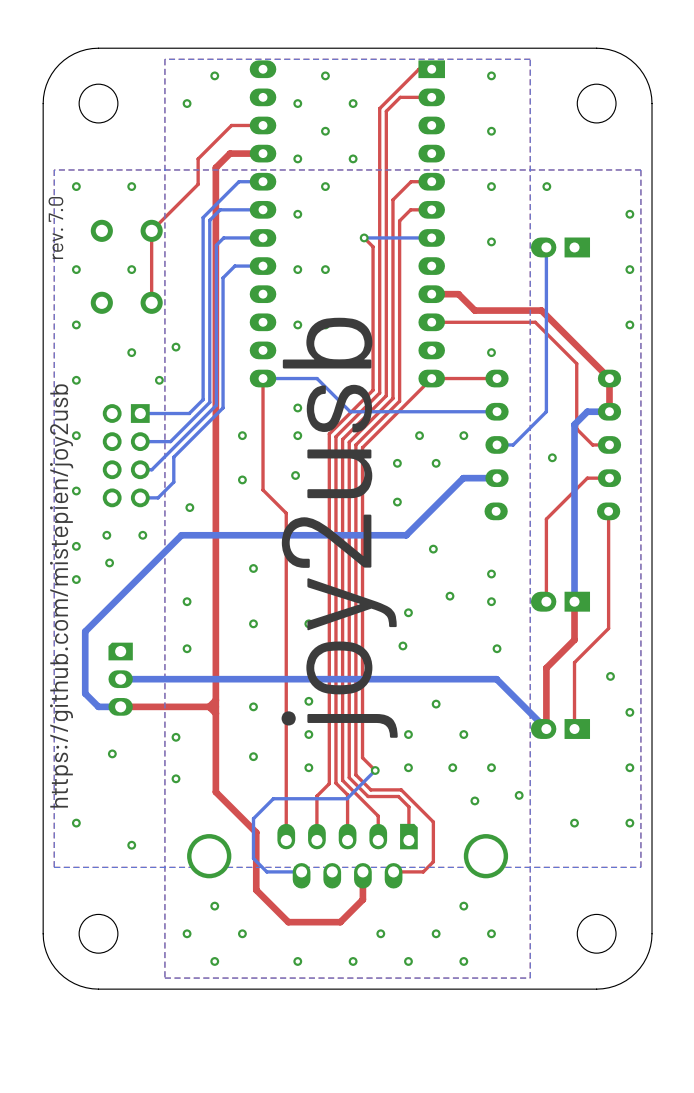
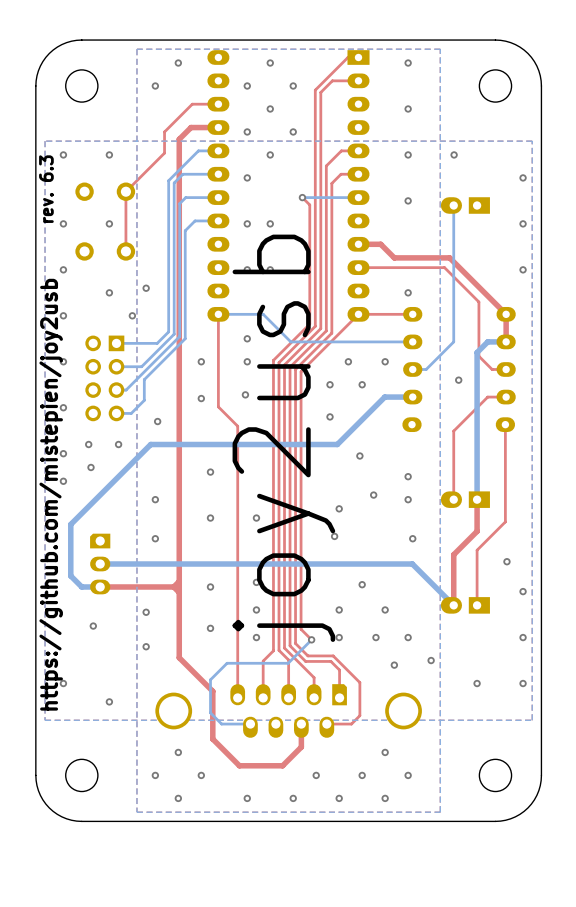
text: rev. 7.0 (55, 228) -> rev. 6.3 (46, 189)

